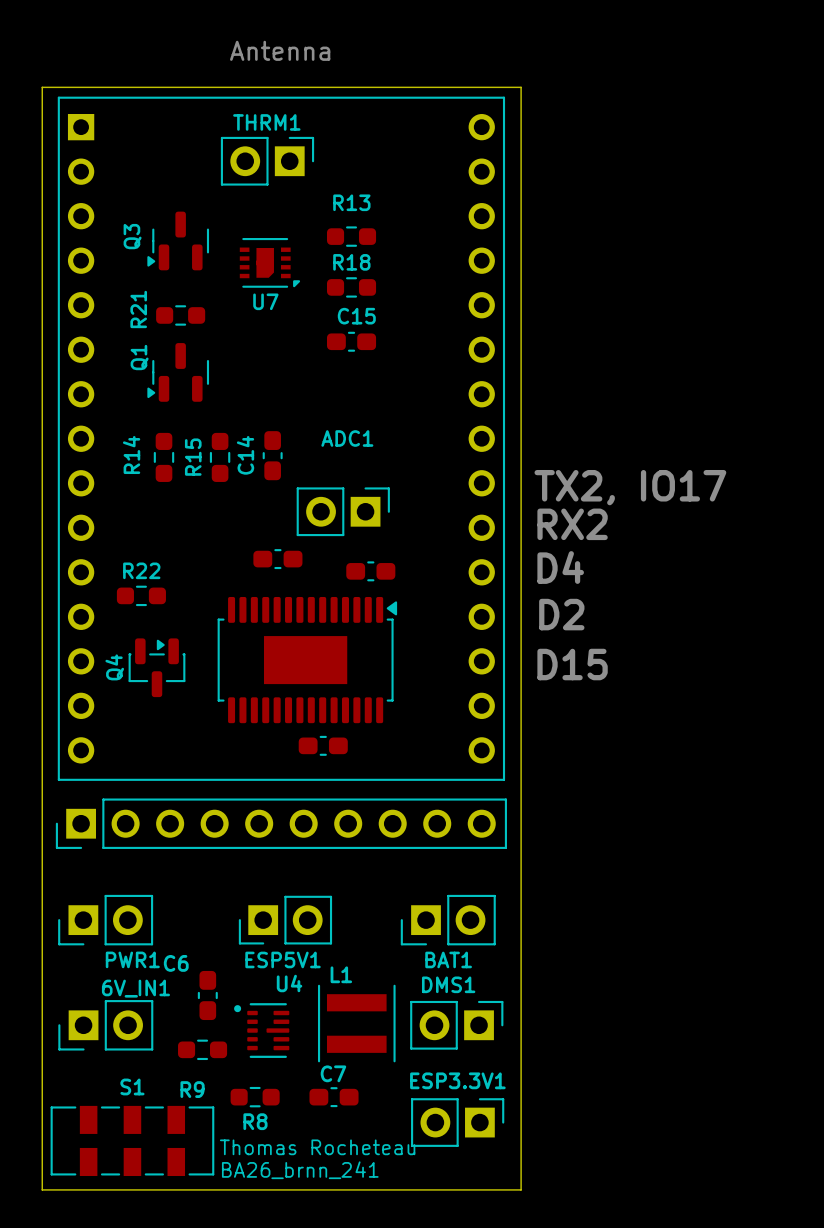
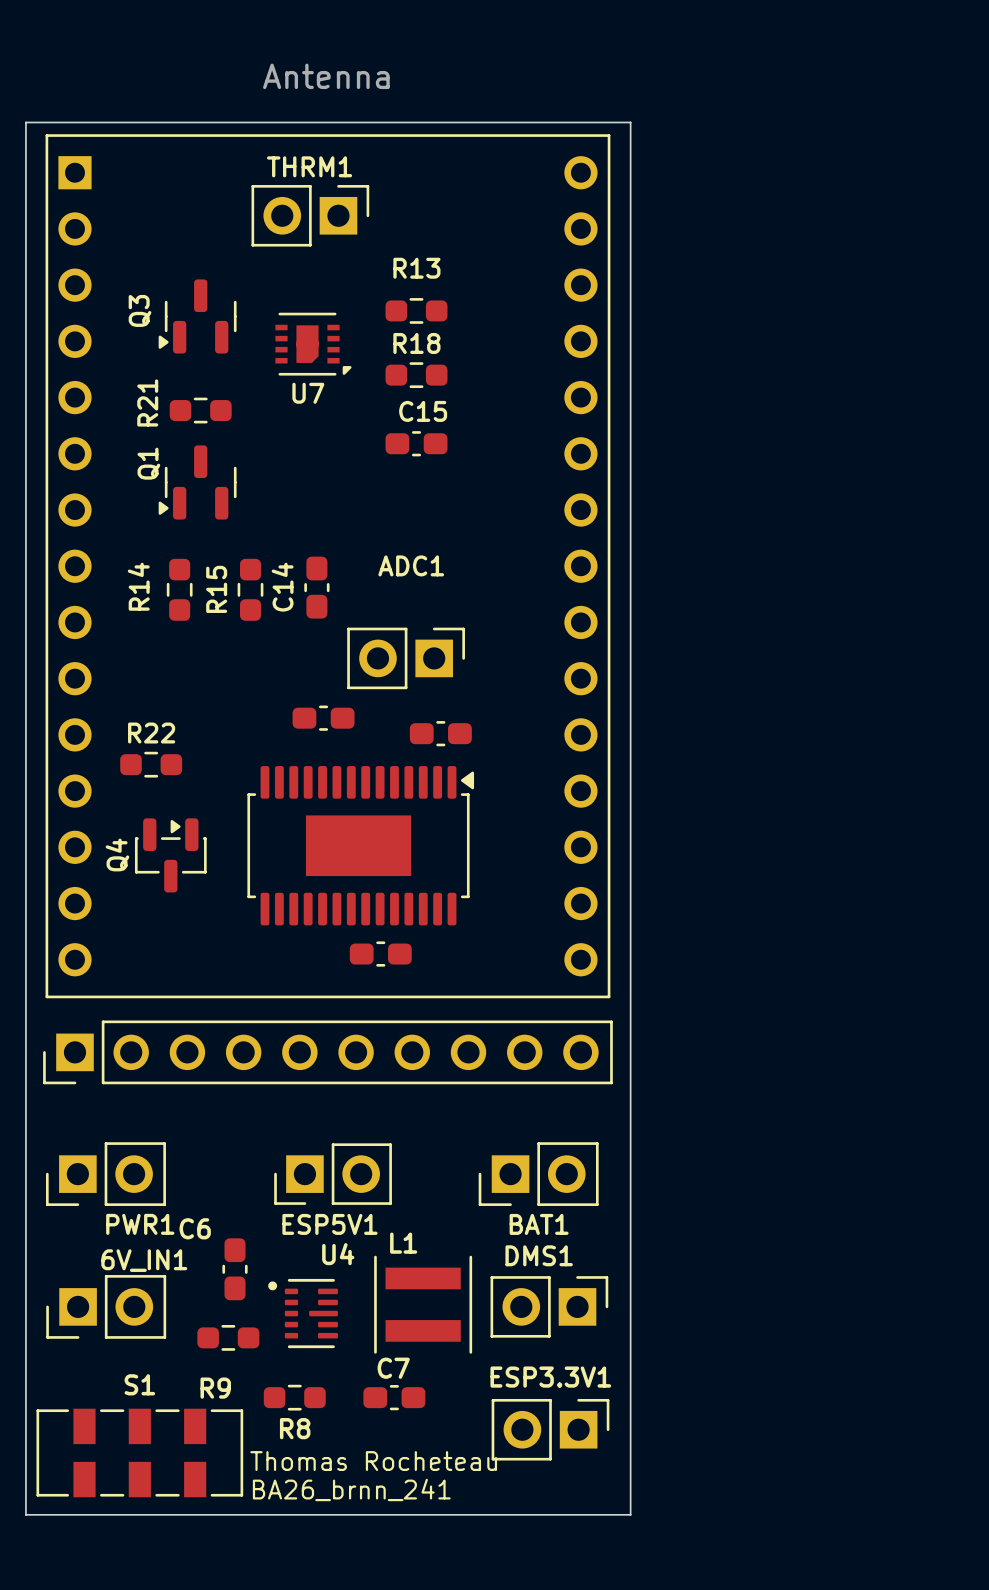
text: TX2, IO17 (630, 487) -> none
text: RX2 (572, 524) -> none
text: D4 (560, 567) -> none
text: D2 (561, 614) -> none
text: D15 (572, 664) -> none

